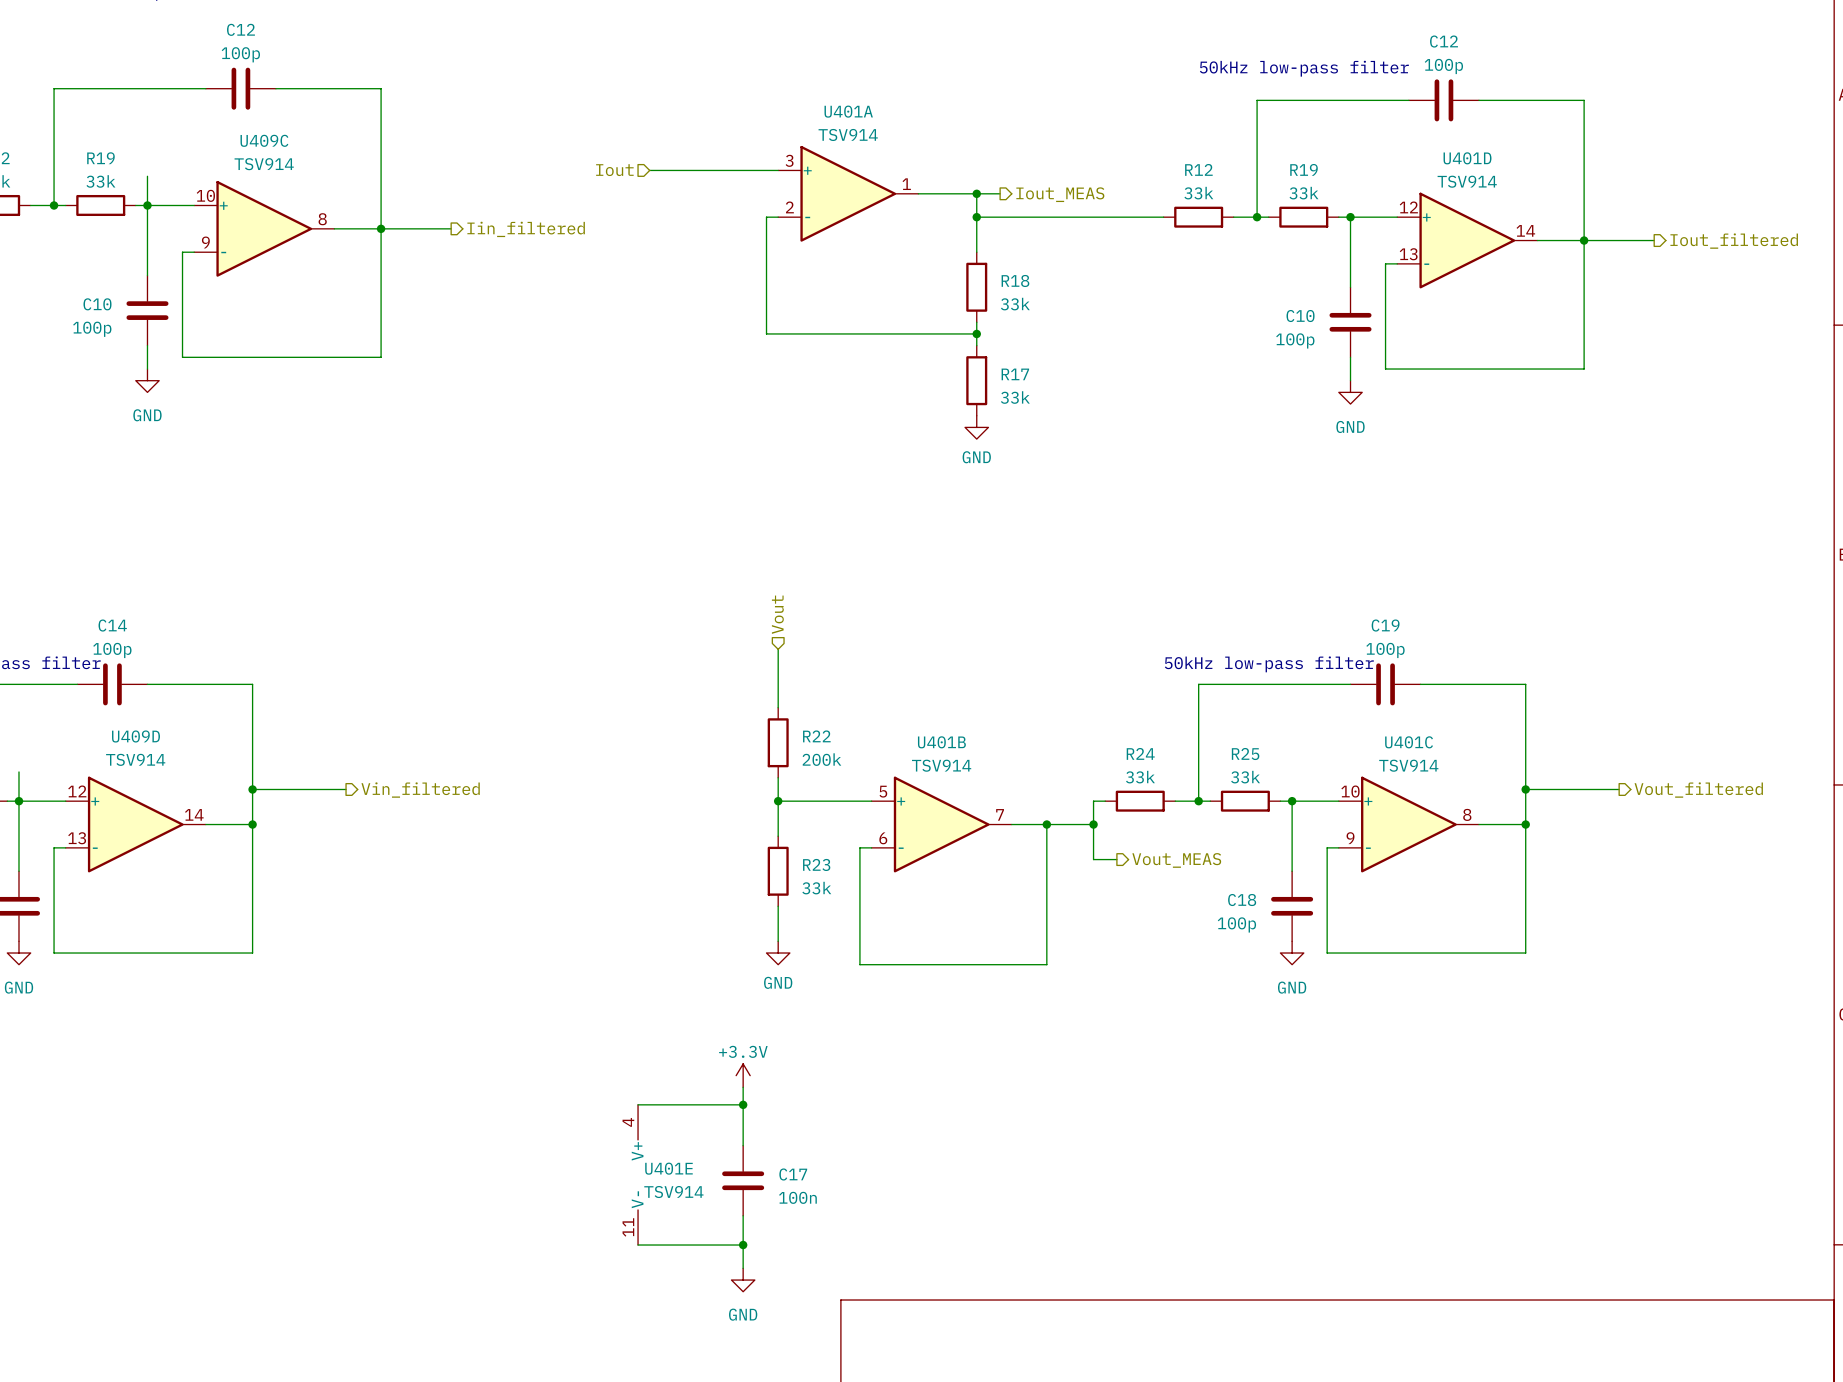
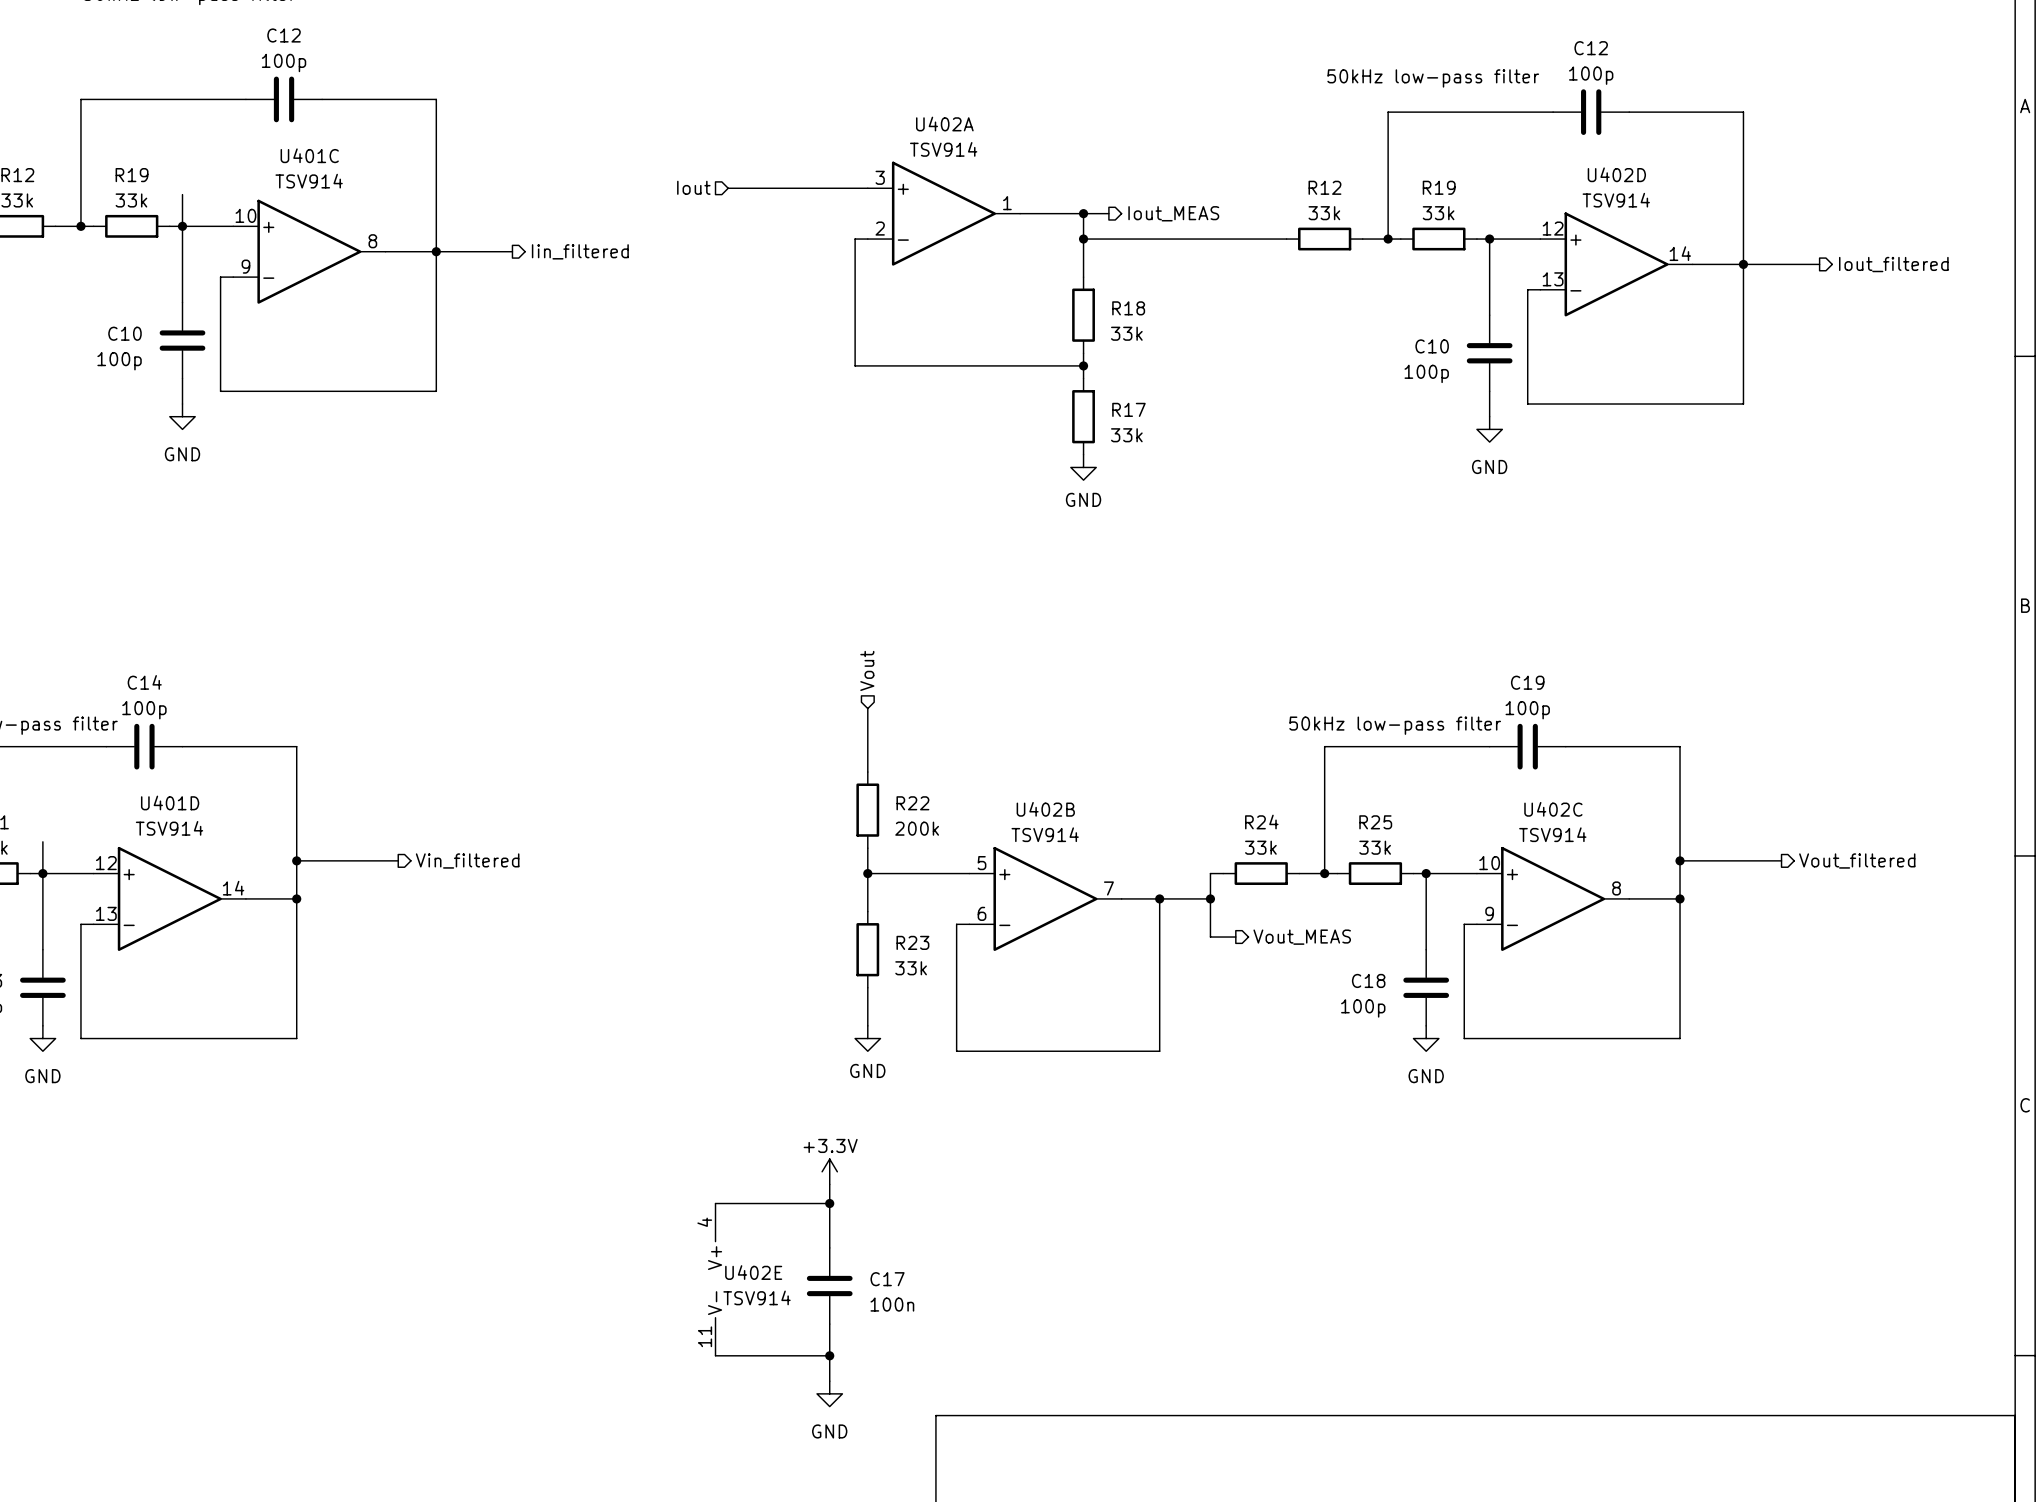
U401A name: U401A (848, 111) -> U402A (944, 124)
U409C name: U409C (264, 140) -> U401C (309, 155)
U401D name: U401D (1467, 158) -> U402D (1616, 174)
U409D name: U409D (135, 736) -> U401D (170, 802)
U401B name: U401B (941, 742) -> U402B (1045, 809)
U401C name: U401C (1409, 742) -> U402C (1553, 809)
U401E name: U401E (668, 1168) -> U402E (753, 1272)

